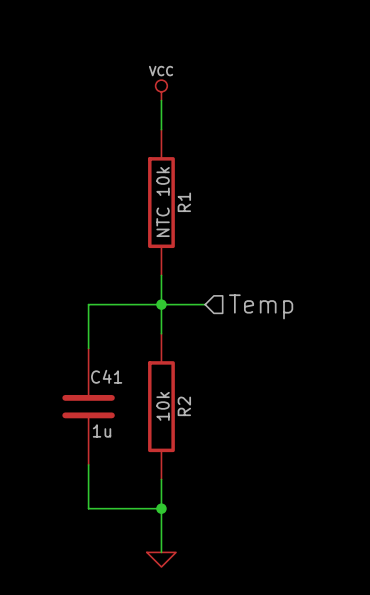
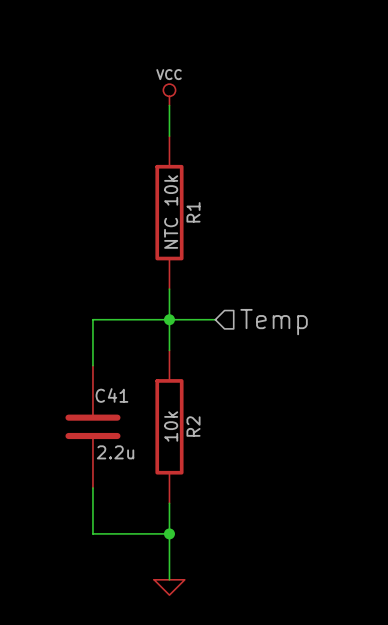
C41 value: 1u (102, 430) -> 2.2u (115, 452)

